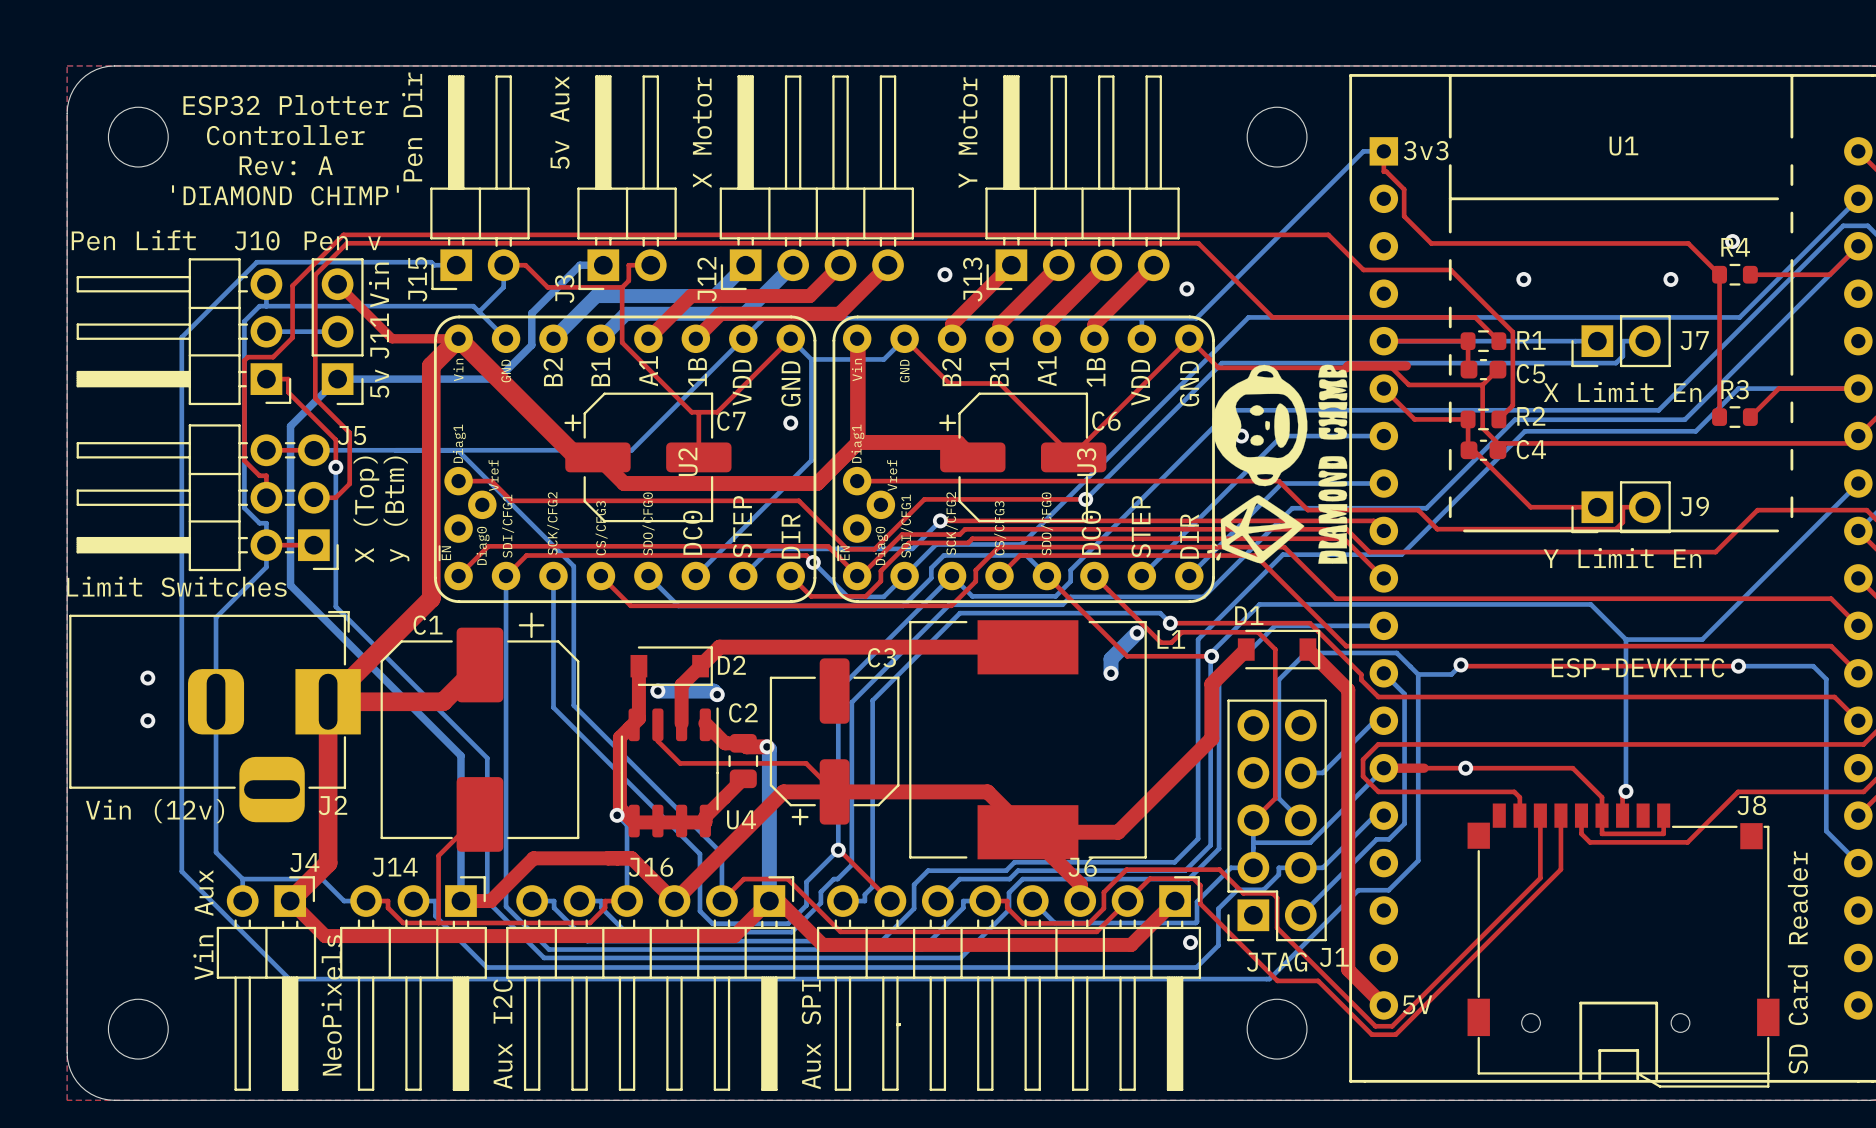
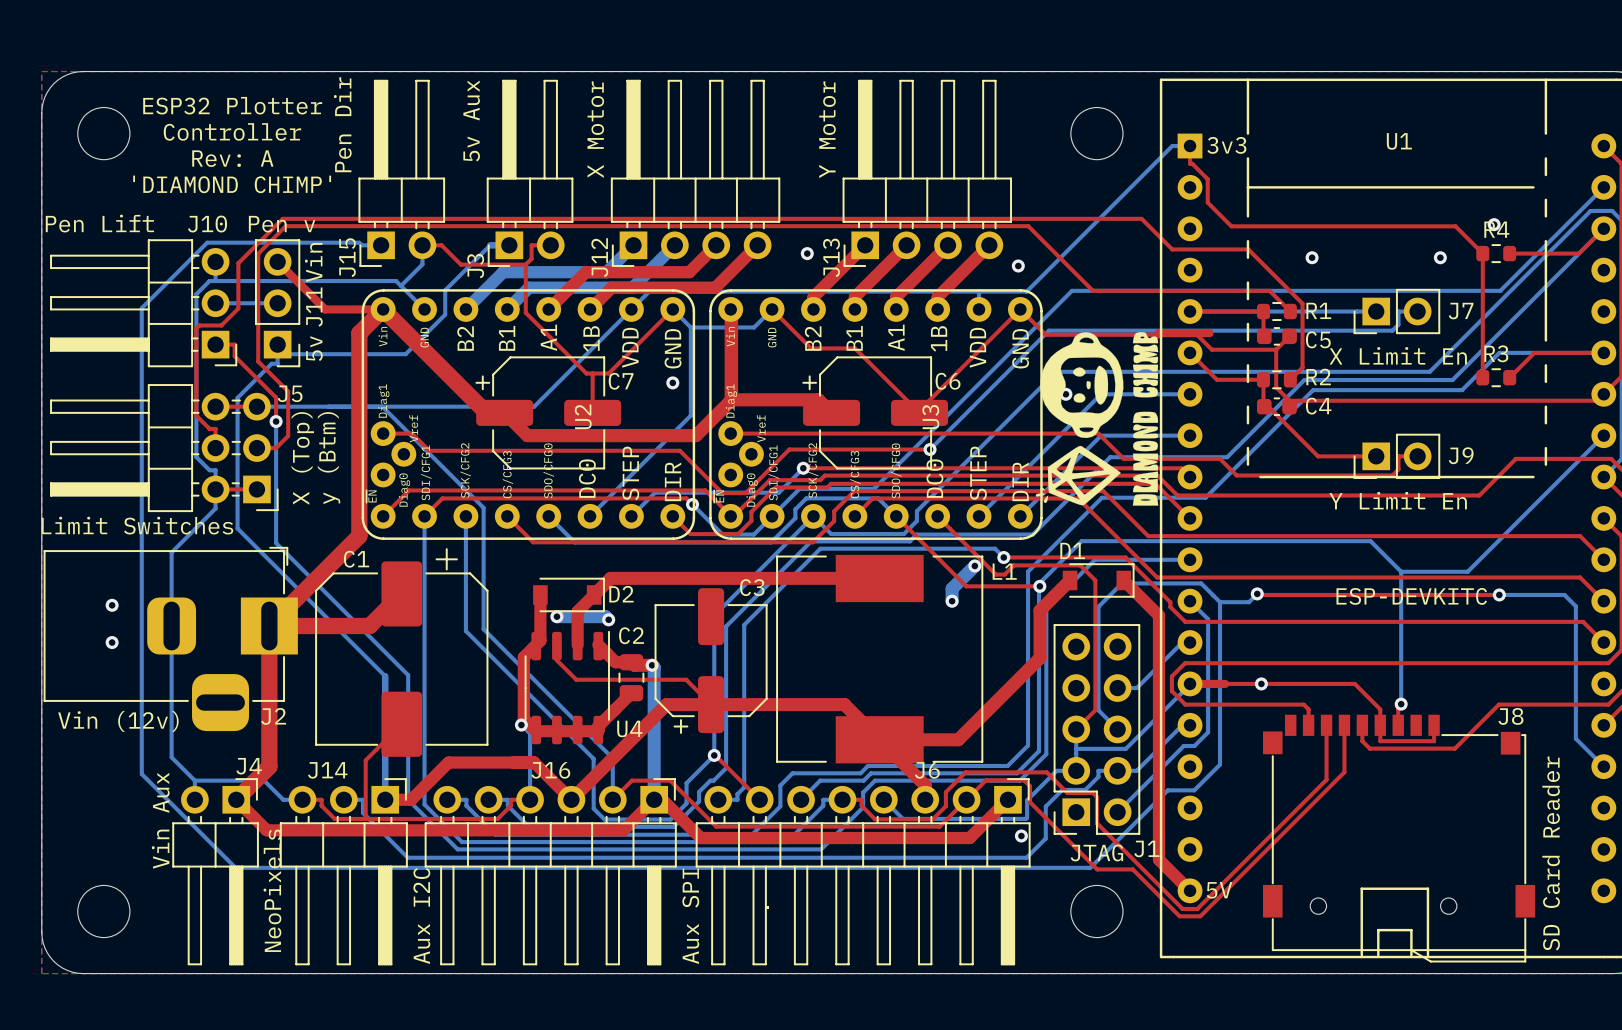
bottom track: (581, 265) (531, 313) (531, 345) (497, 379) (337, 379) (290, 426) (290, 585) (460, 755) (460, 759) -> (277, 344) (277, 363) (271, 363) (237, 397) (237, 528) (385, 676)
bottom track: none -> (490, 245) (445, 290) (445, 314) (405, 354) (277, 354)

